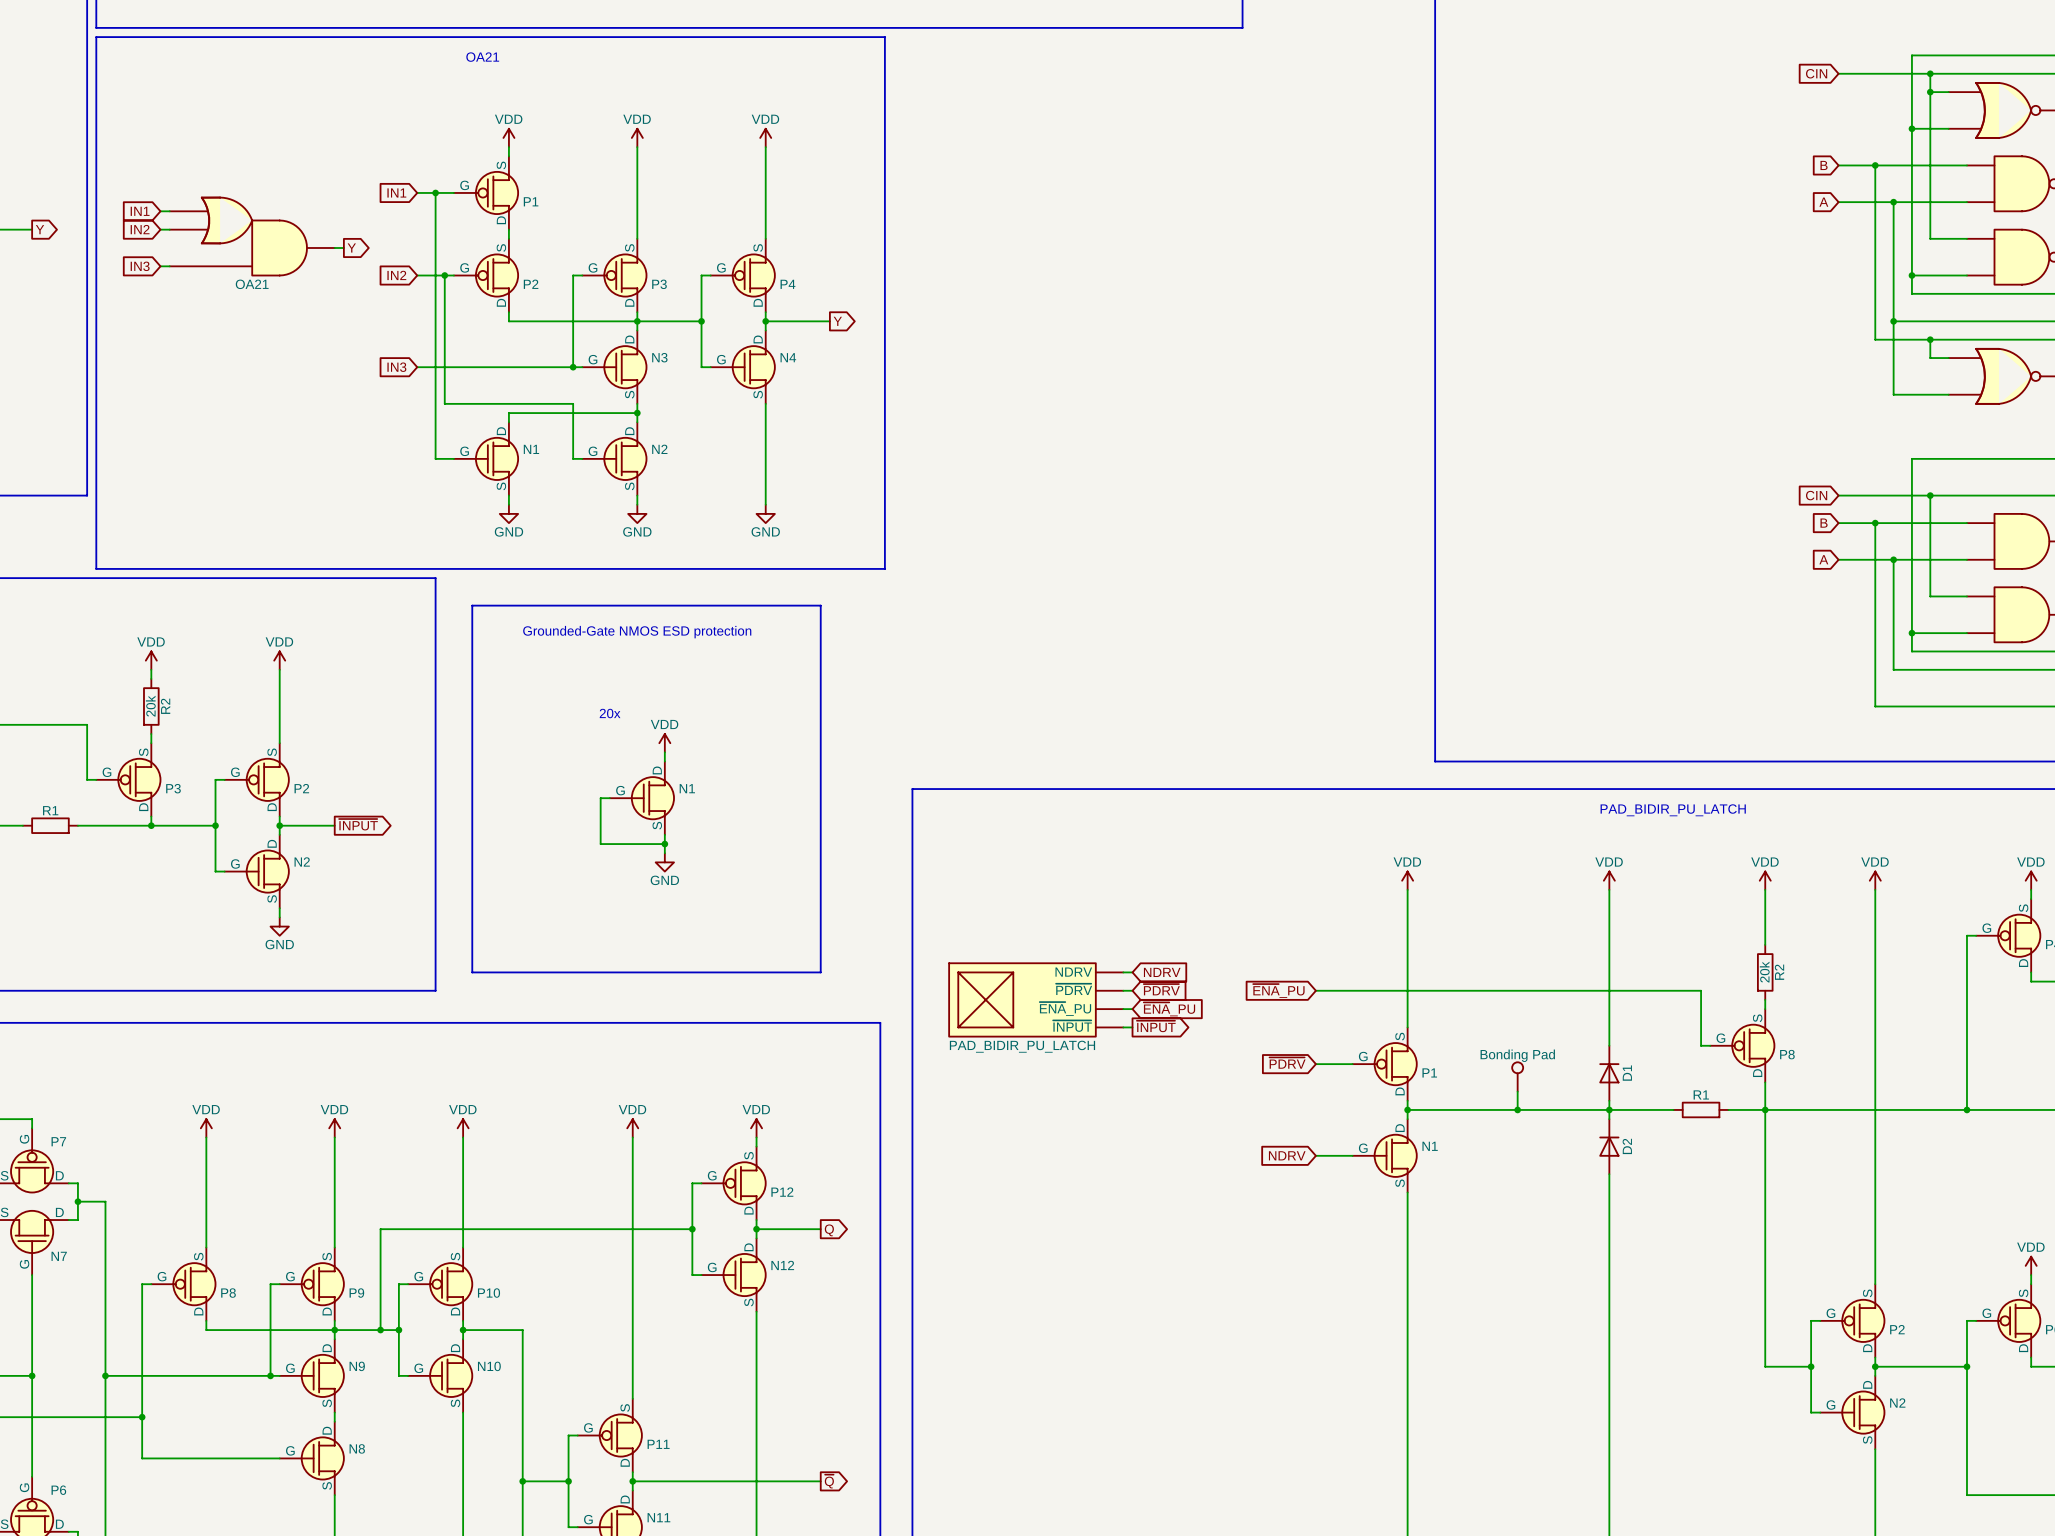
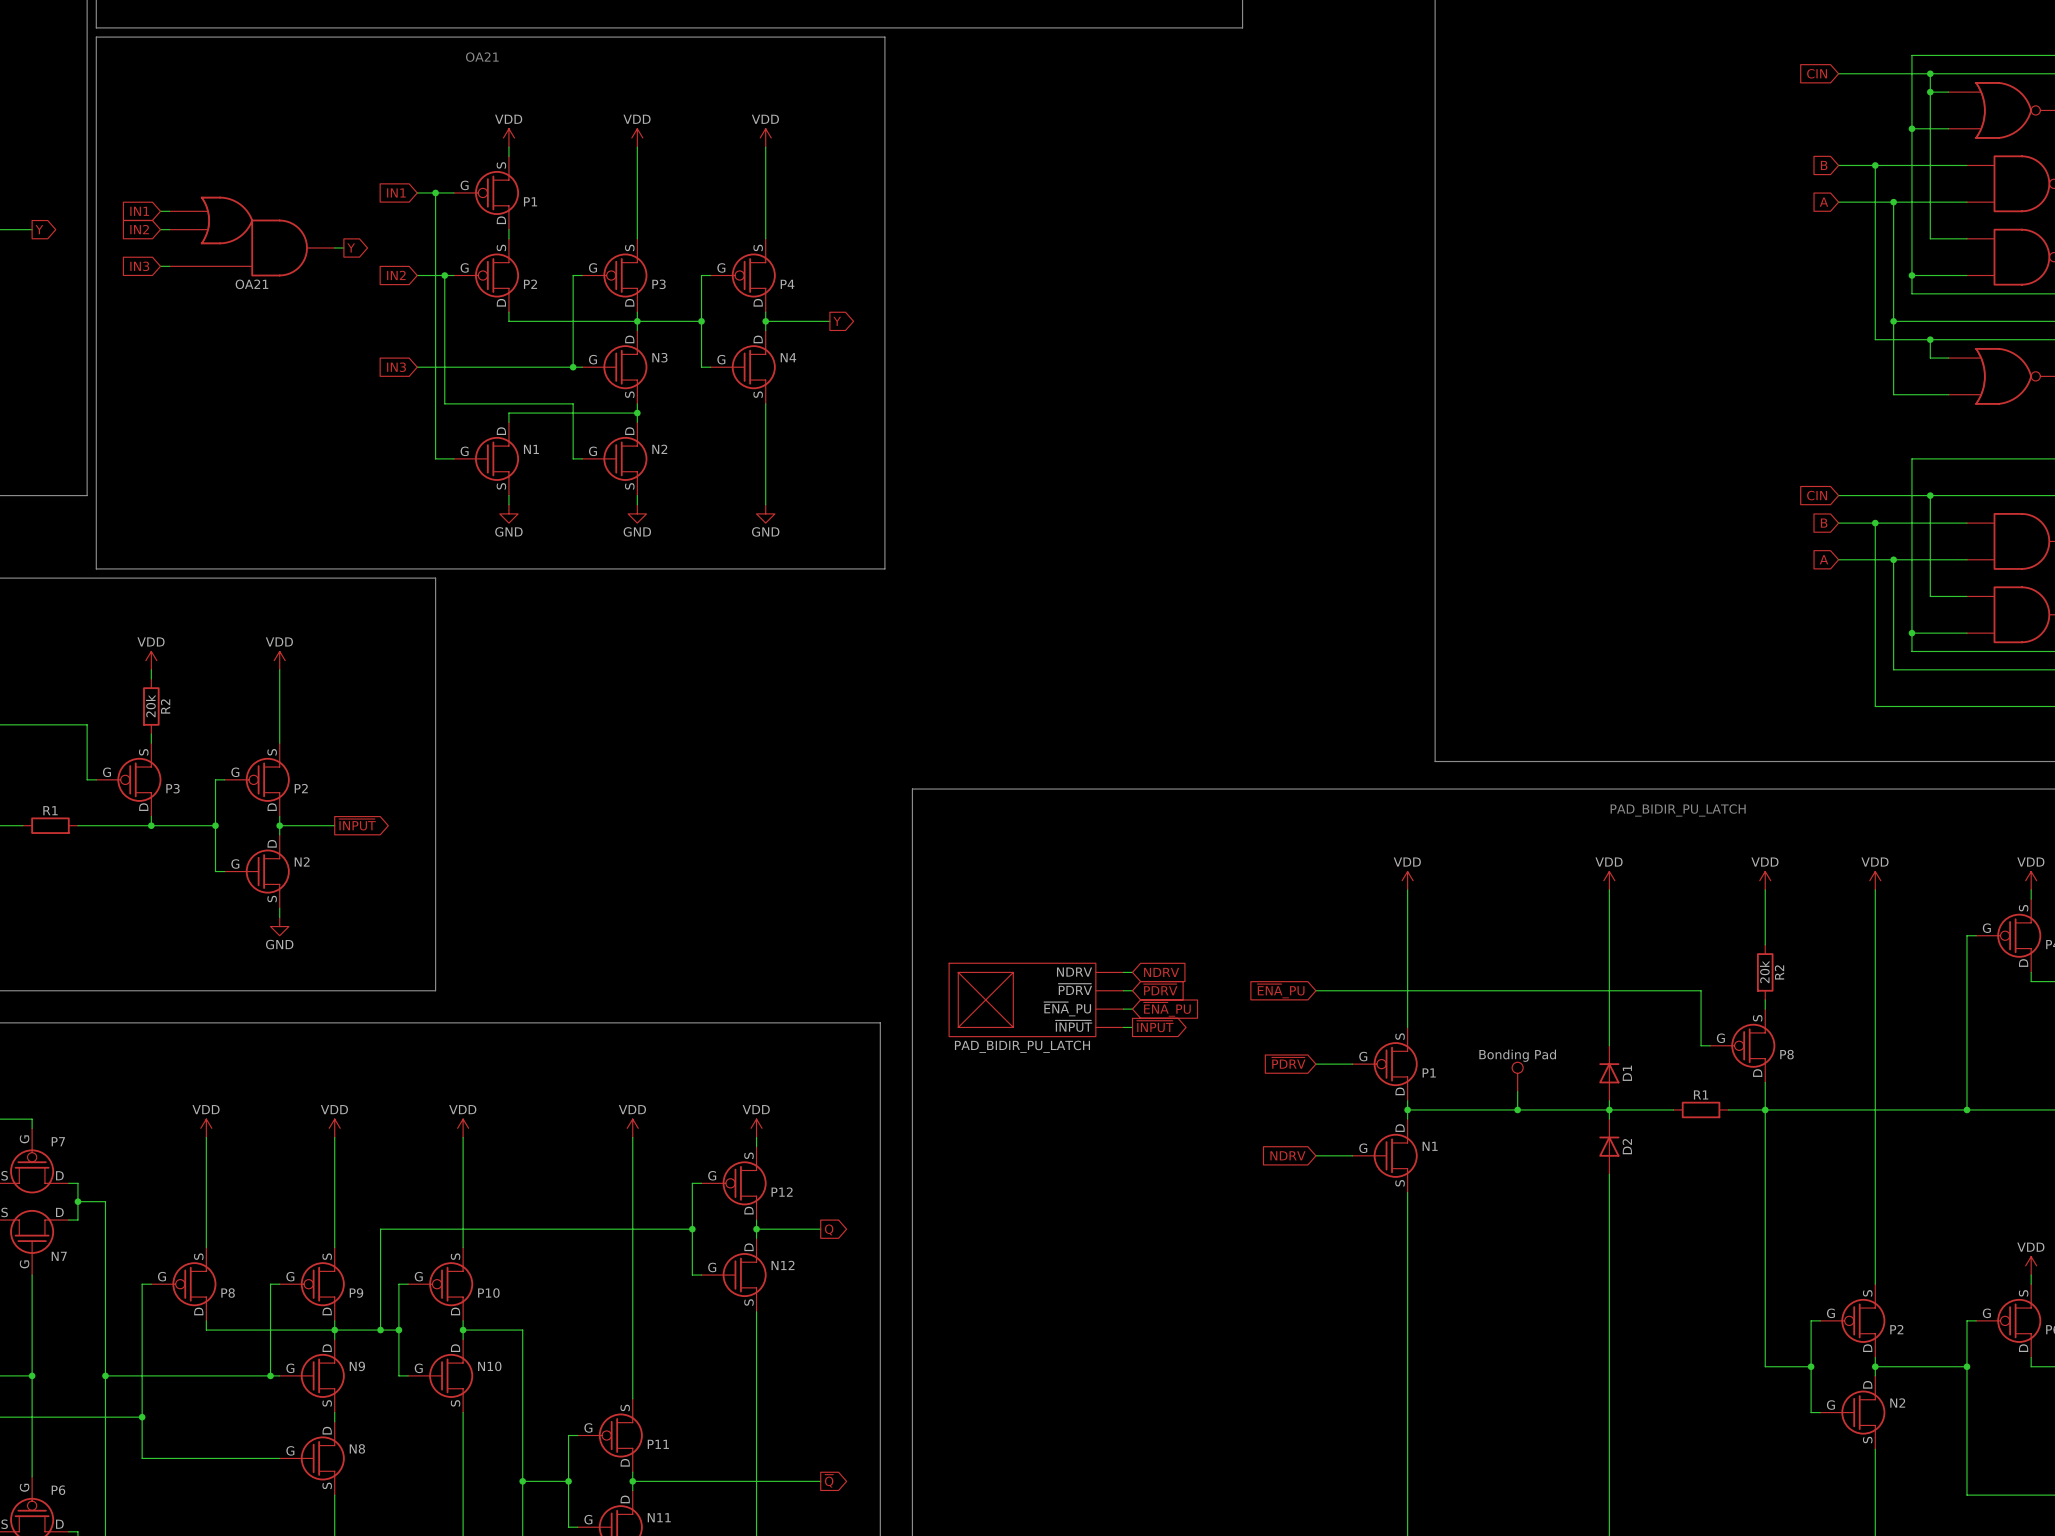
line: (472, 605) (820, 605) (820, 972) (472, 972) (472, 605) -> none
text: Grounded-Gate NMOS ESD protection (637, 632) -> none
text: 20x (610, 713) -> none
power symbol: VDD (664, 743) -> none
wire: (664, 752) (664, 761) -> none
wire: (609, 798) (600, 798) (600, 844) (664, 844) -> none
N1: (642, 798) -> none
wire: (664, 834) (664, 853) -> none
junction: (664, 844) -> none
power symbol: GND (664, 862) -> none

